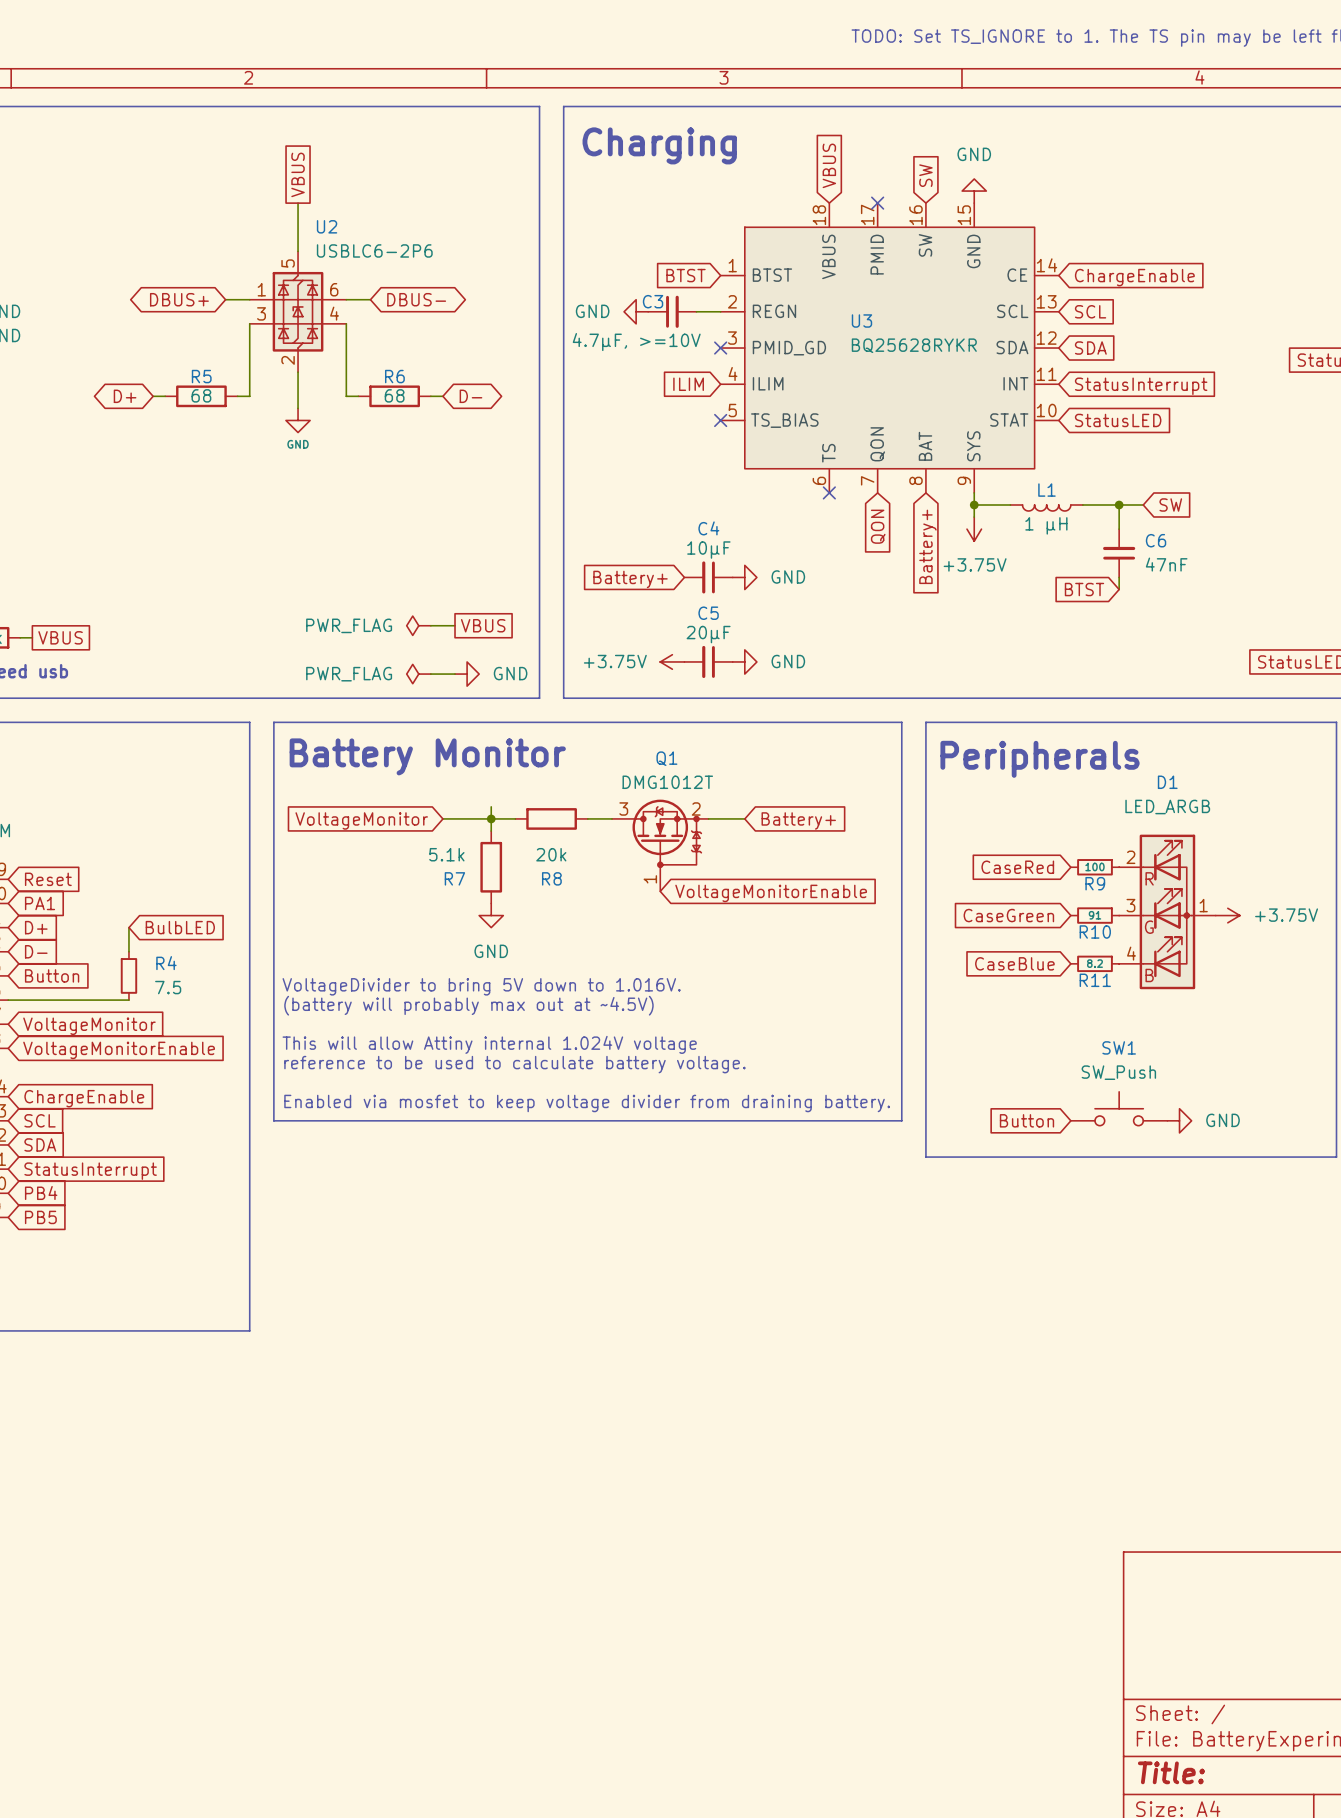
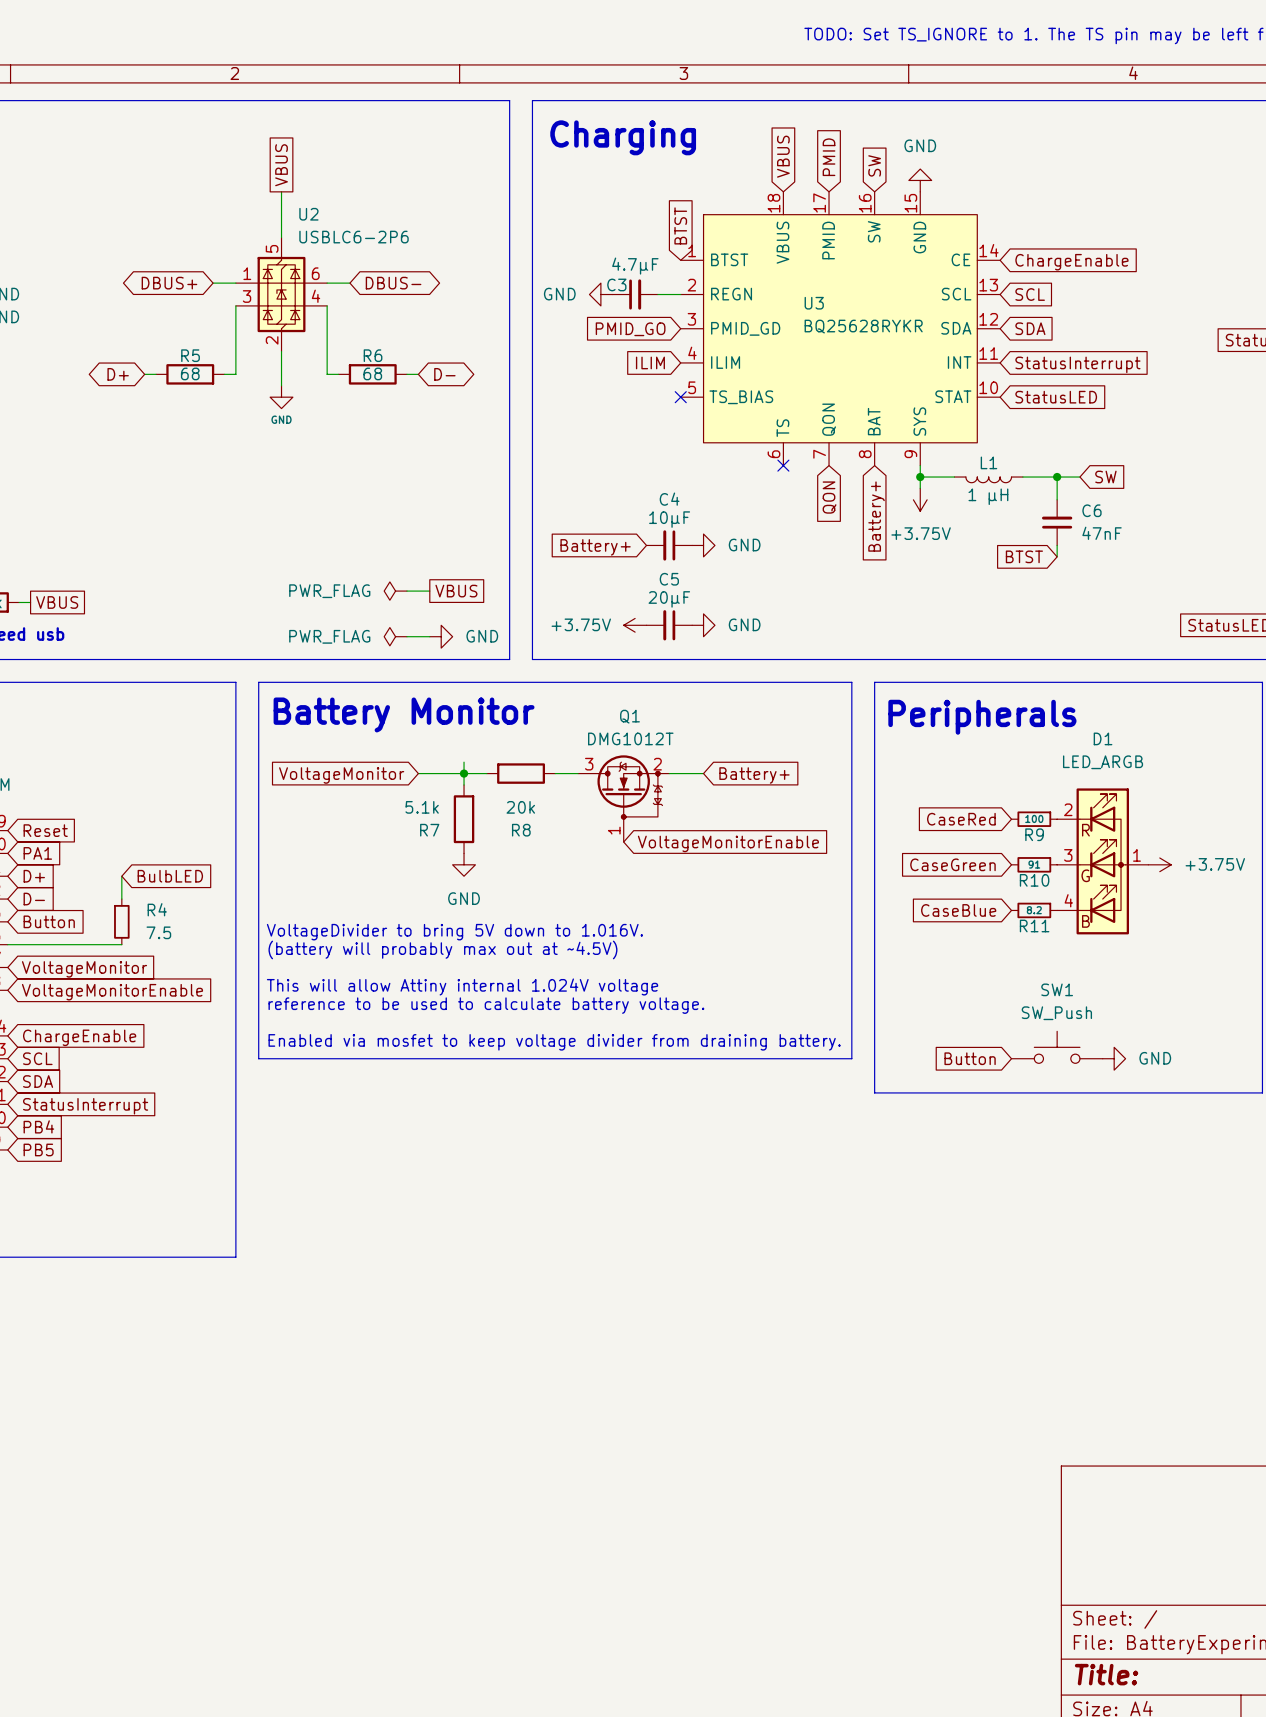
global label: none -> PMID (829, 157)
no-connect mark: (877, 203) -> none
global label rotation: 0° (686, 275) -> 90° clockwise (680, 225)
C3 value: 4.7μF, >=10V (636, 342) -> 4.7μF (635, 266)
global label: none -> PMID_GO (630, 329)
no-connect mark: (720, 348) -> none

